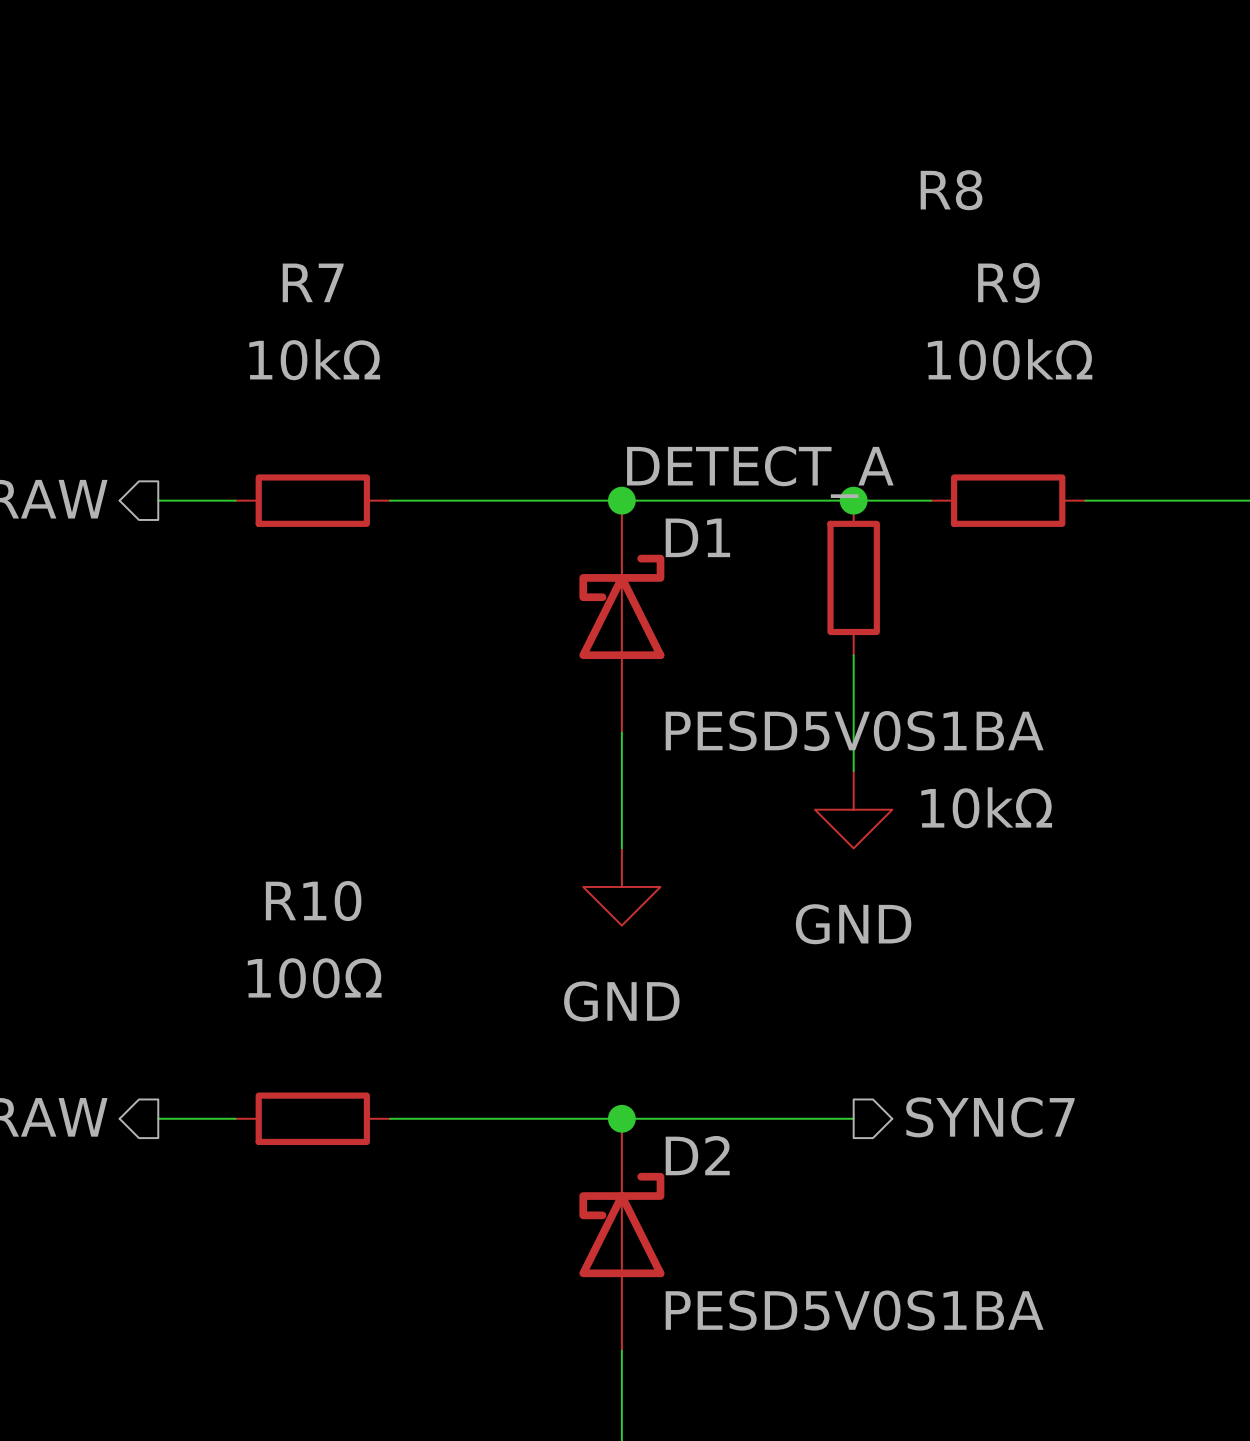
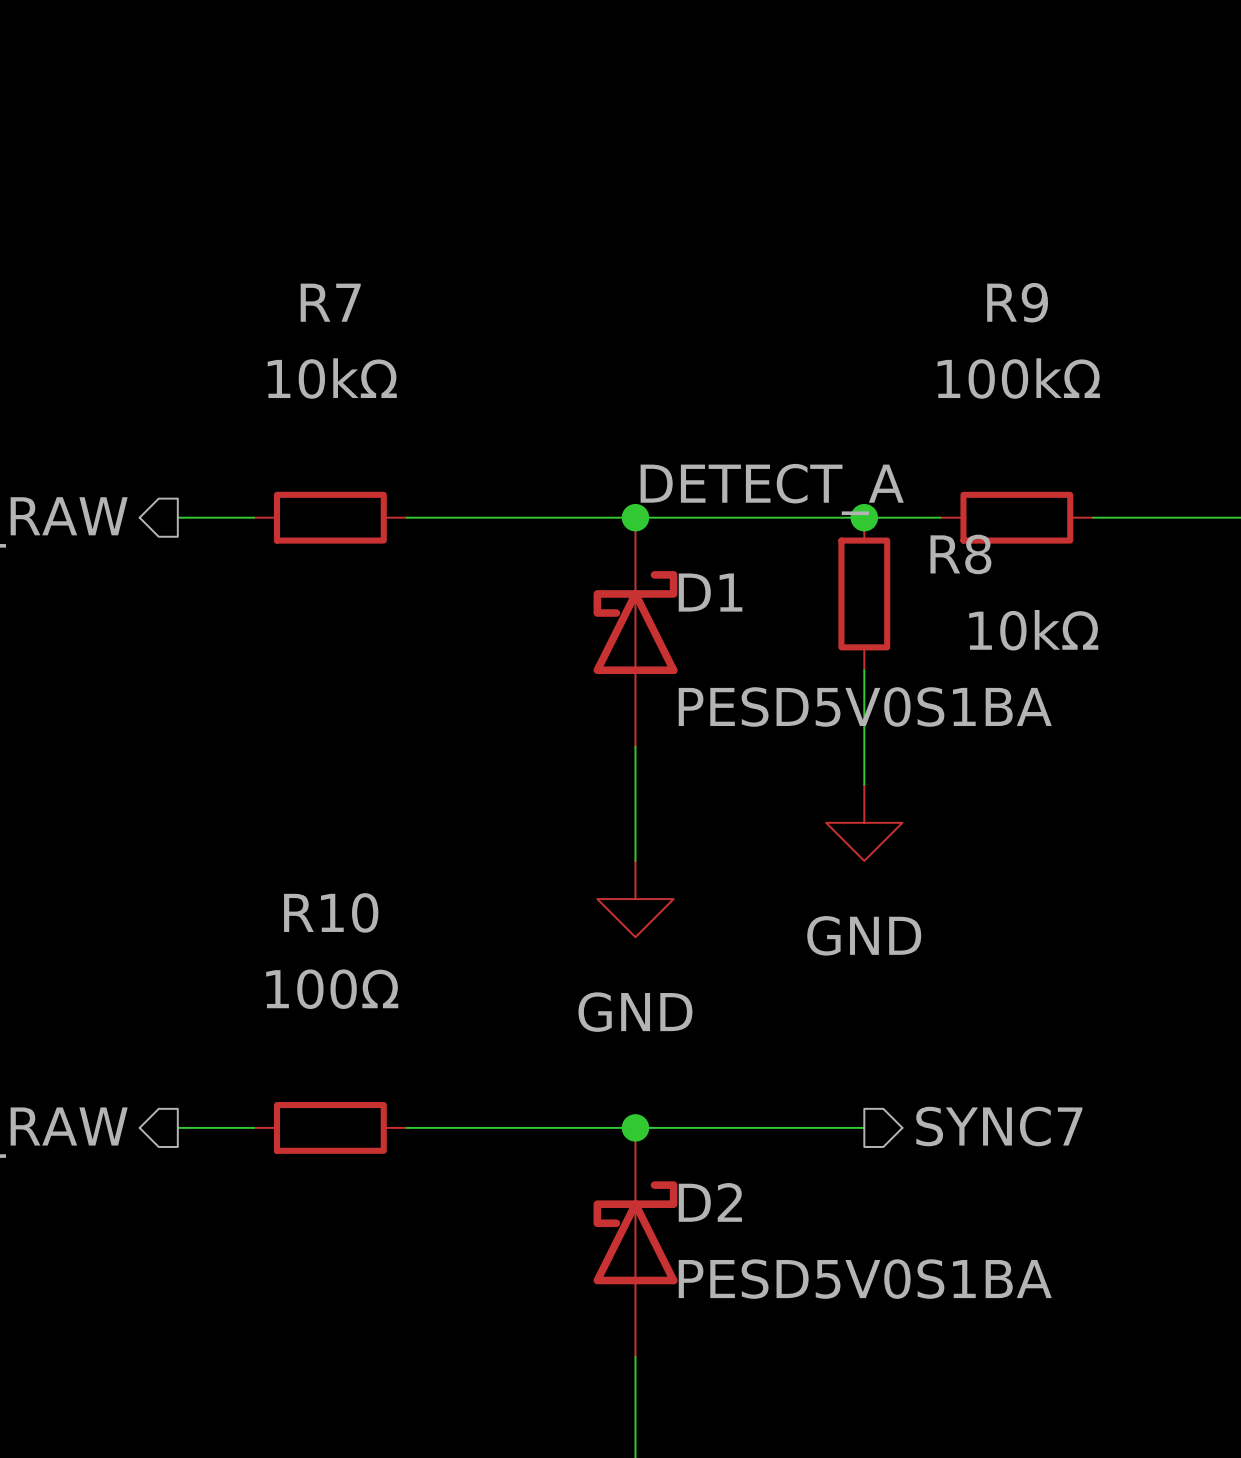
R8 name position: R8 (951, 190) -> R8 (960, 554)
D1 name position: D1 (697, 537) -> D1 (710, 592)
D1 value position: PESD5V0S1BA (854, 731) -> PESD5V0S1BA (865, 706)
R8 value position: 10kΩ (986, 807) -> 10kΩ (1033, 630)
D2 name position: D2 (697, 1155) -> D2 (710, 1202)
D2 value position: PESD5V0S1BA (854, 1310) -> PESD5V0S1BA (865, 1279)

